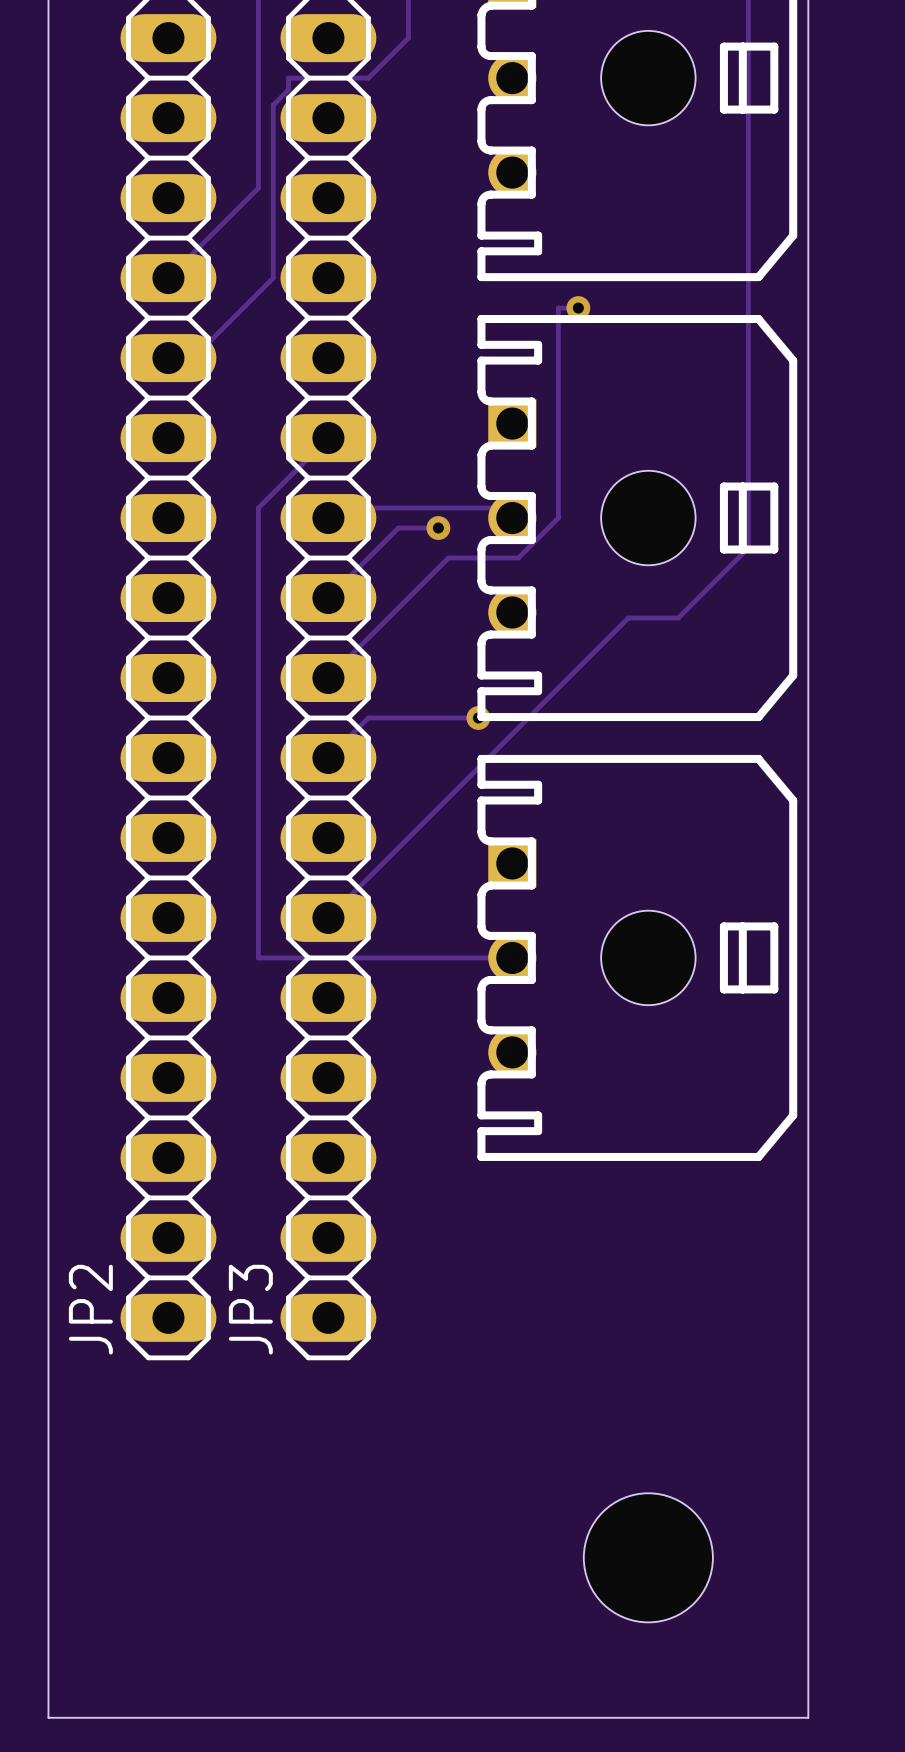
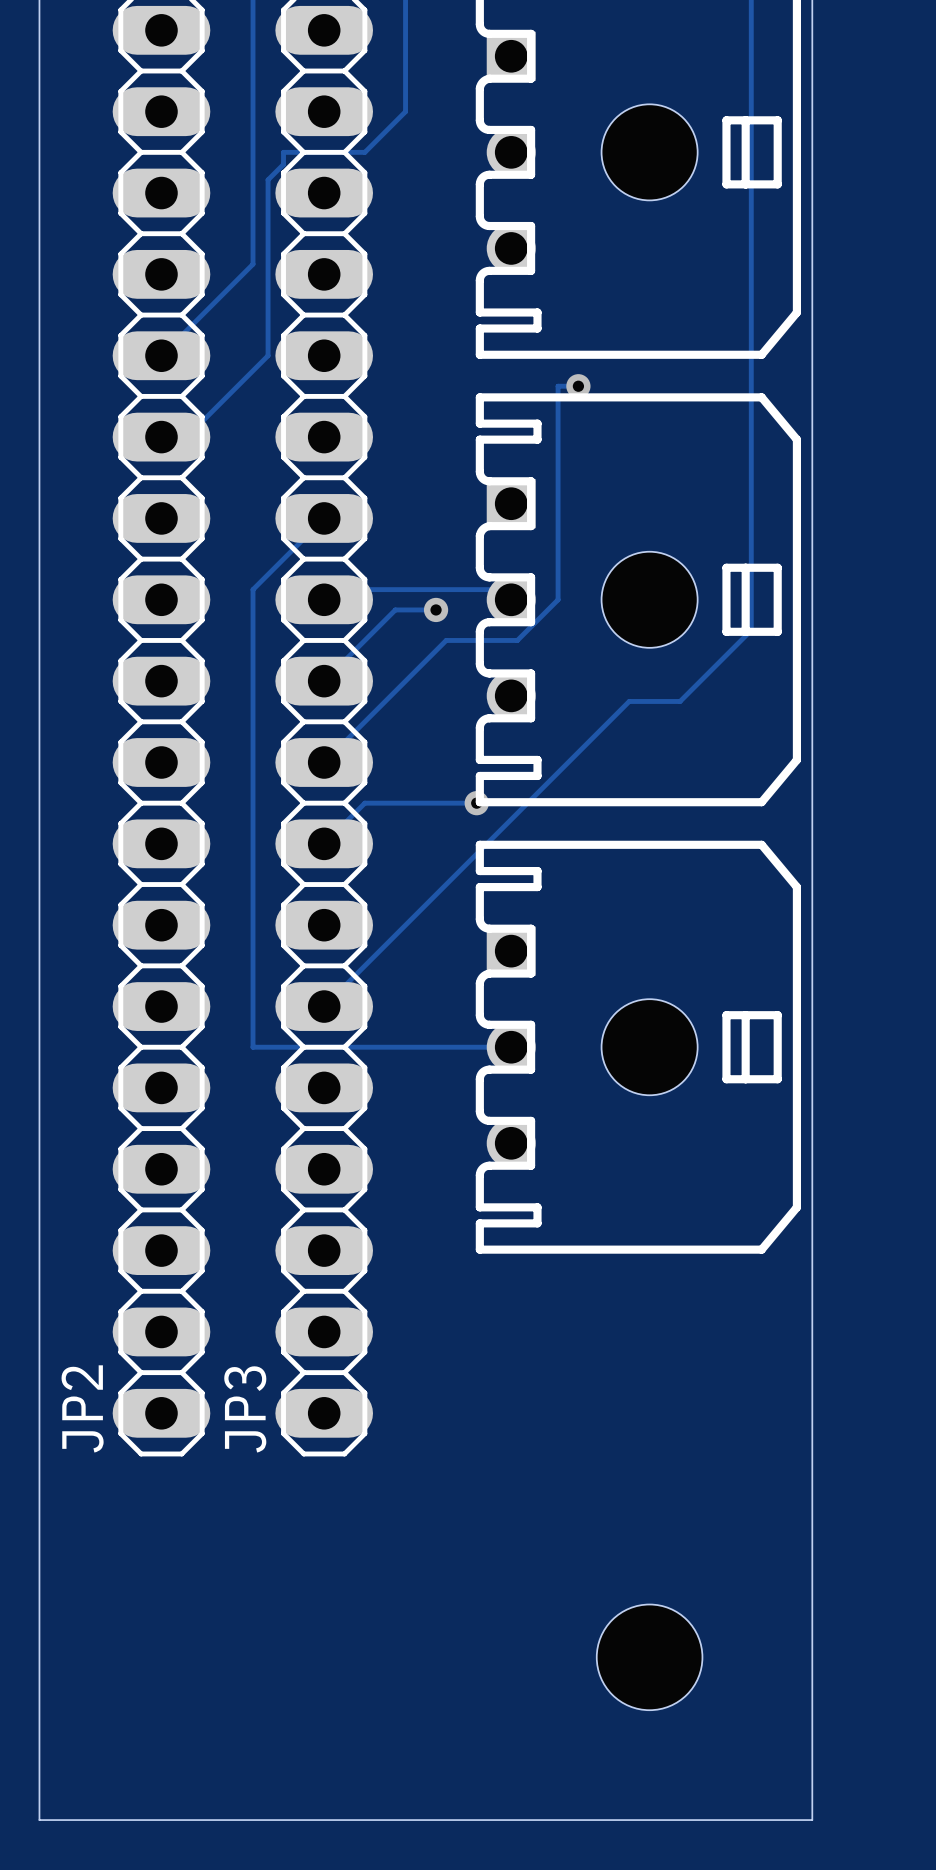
hole size: [583, 1493, 713, 1623] -> [596, 1604, 703, 1711]

